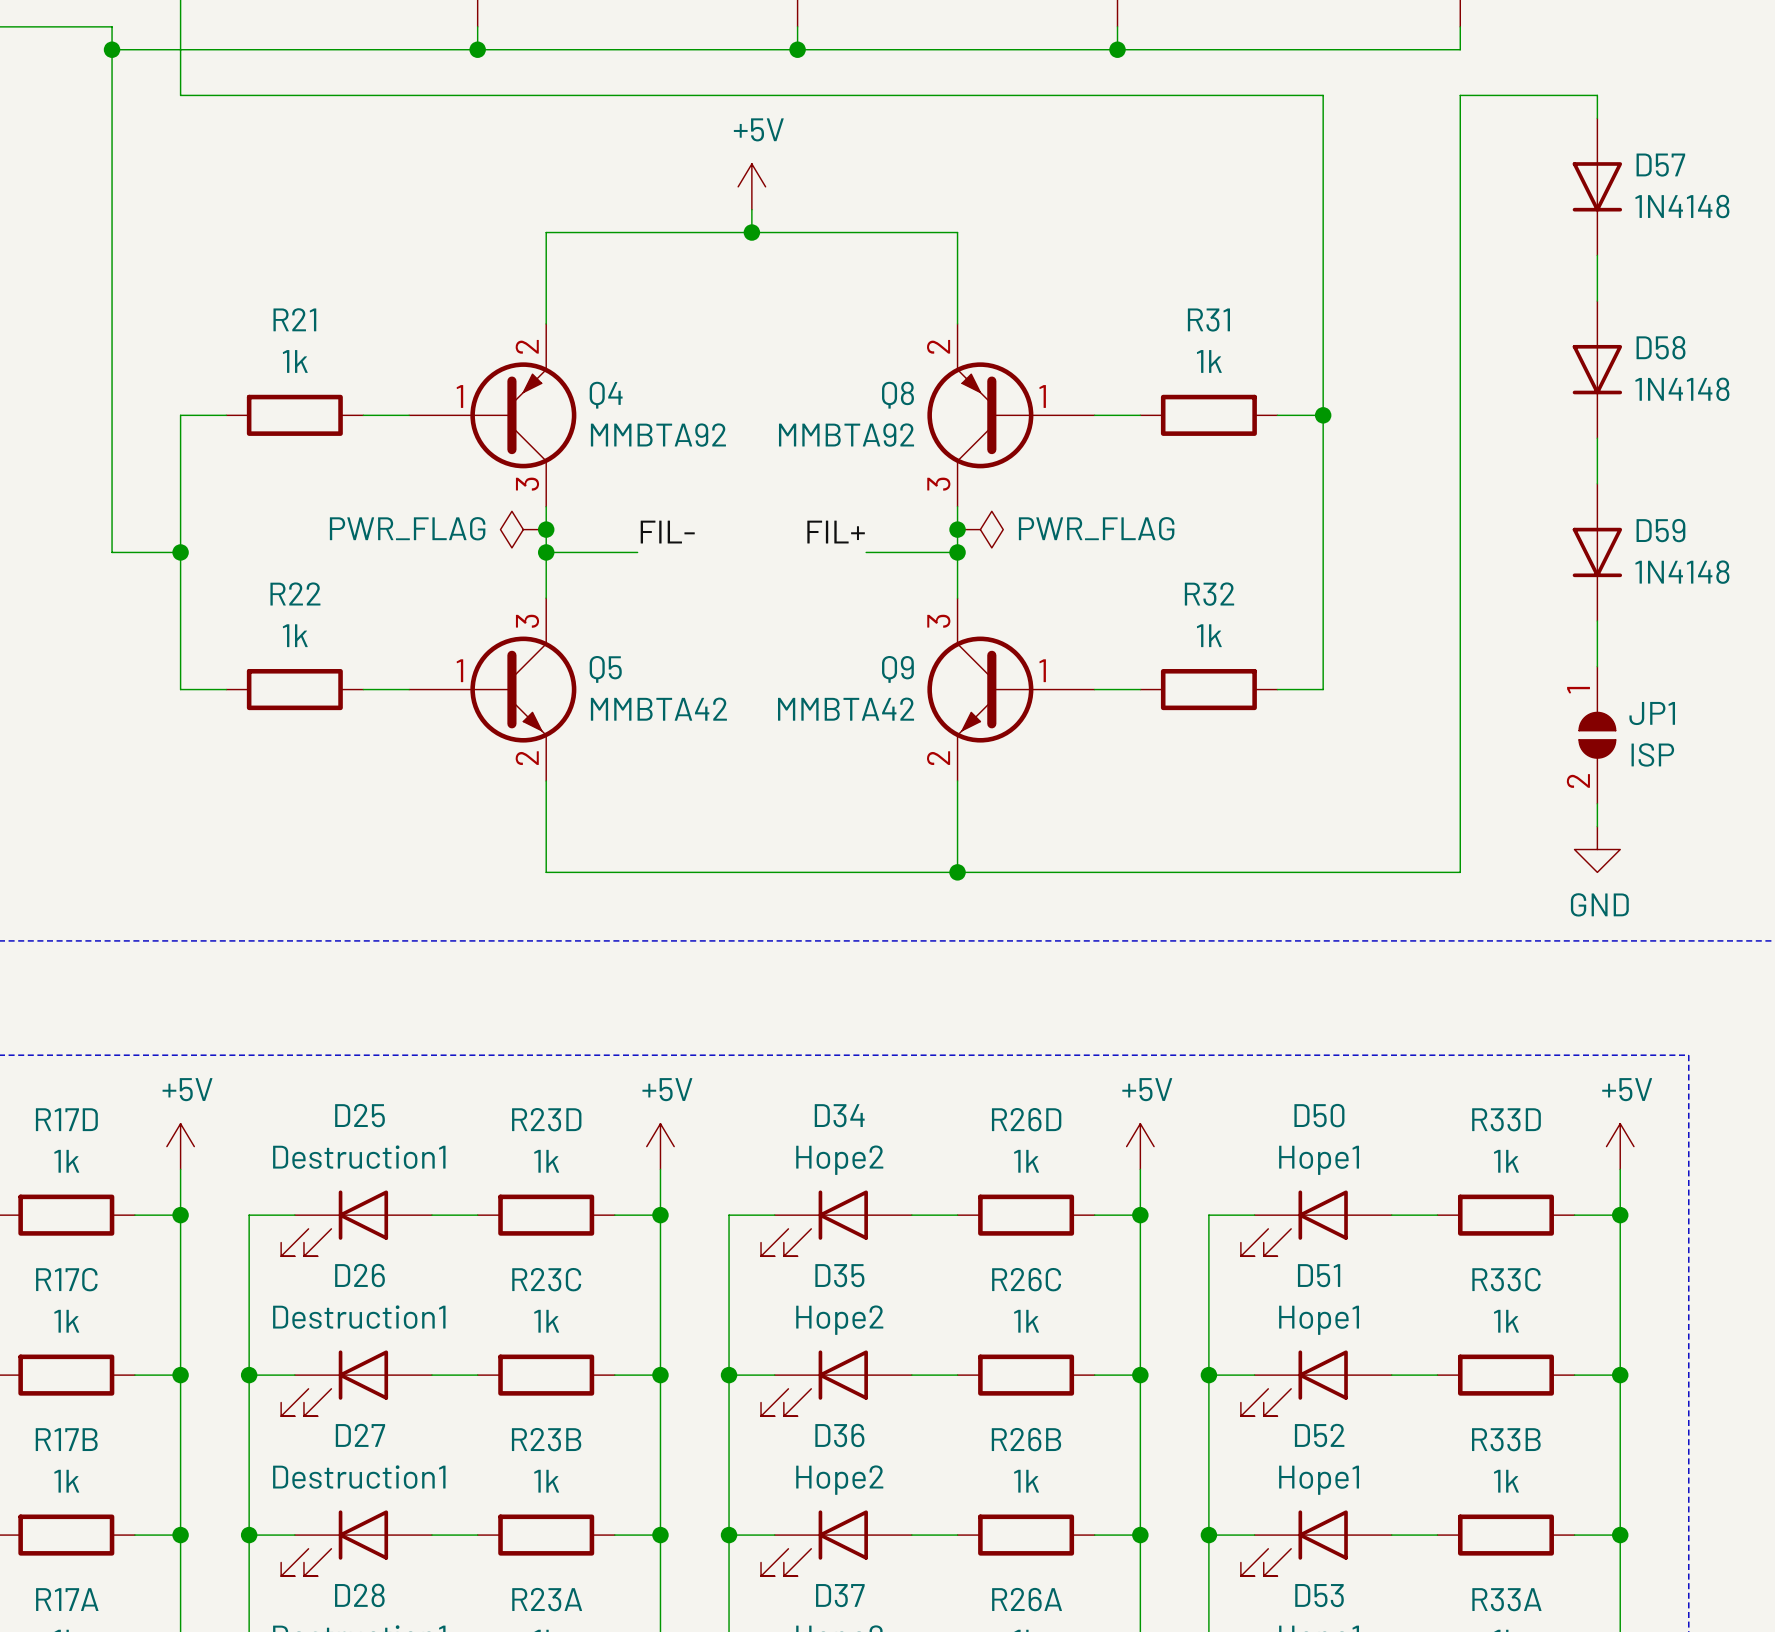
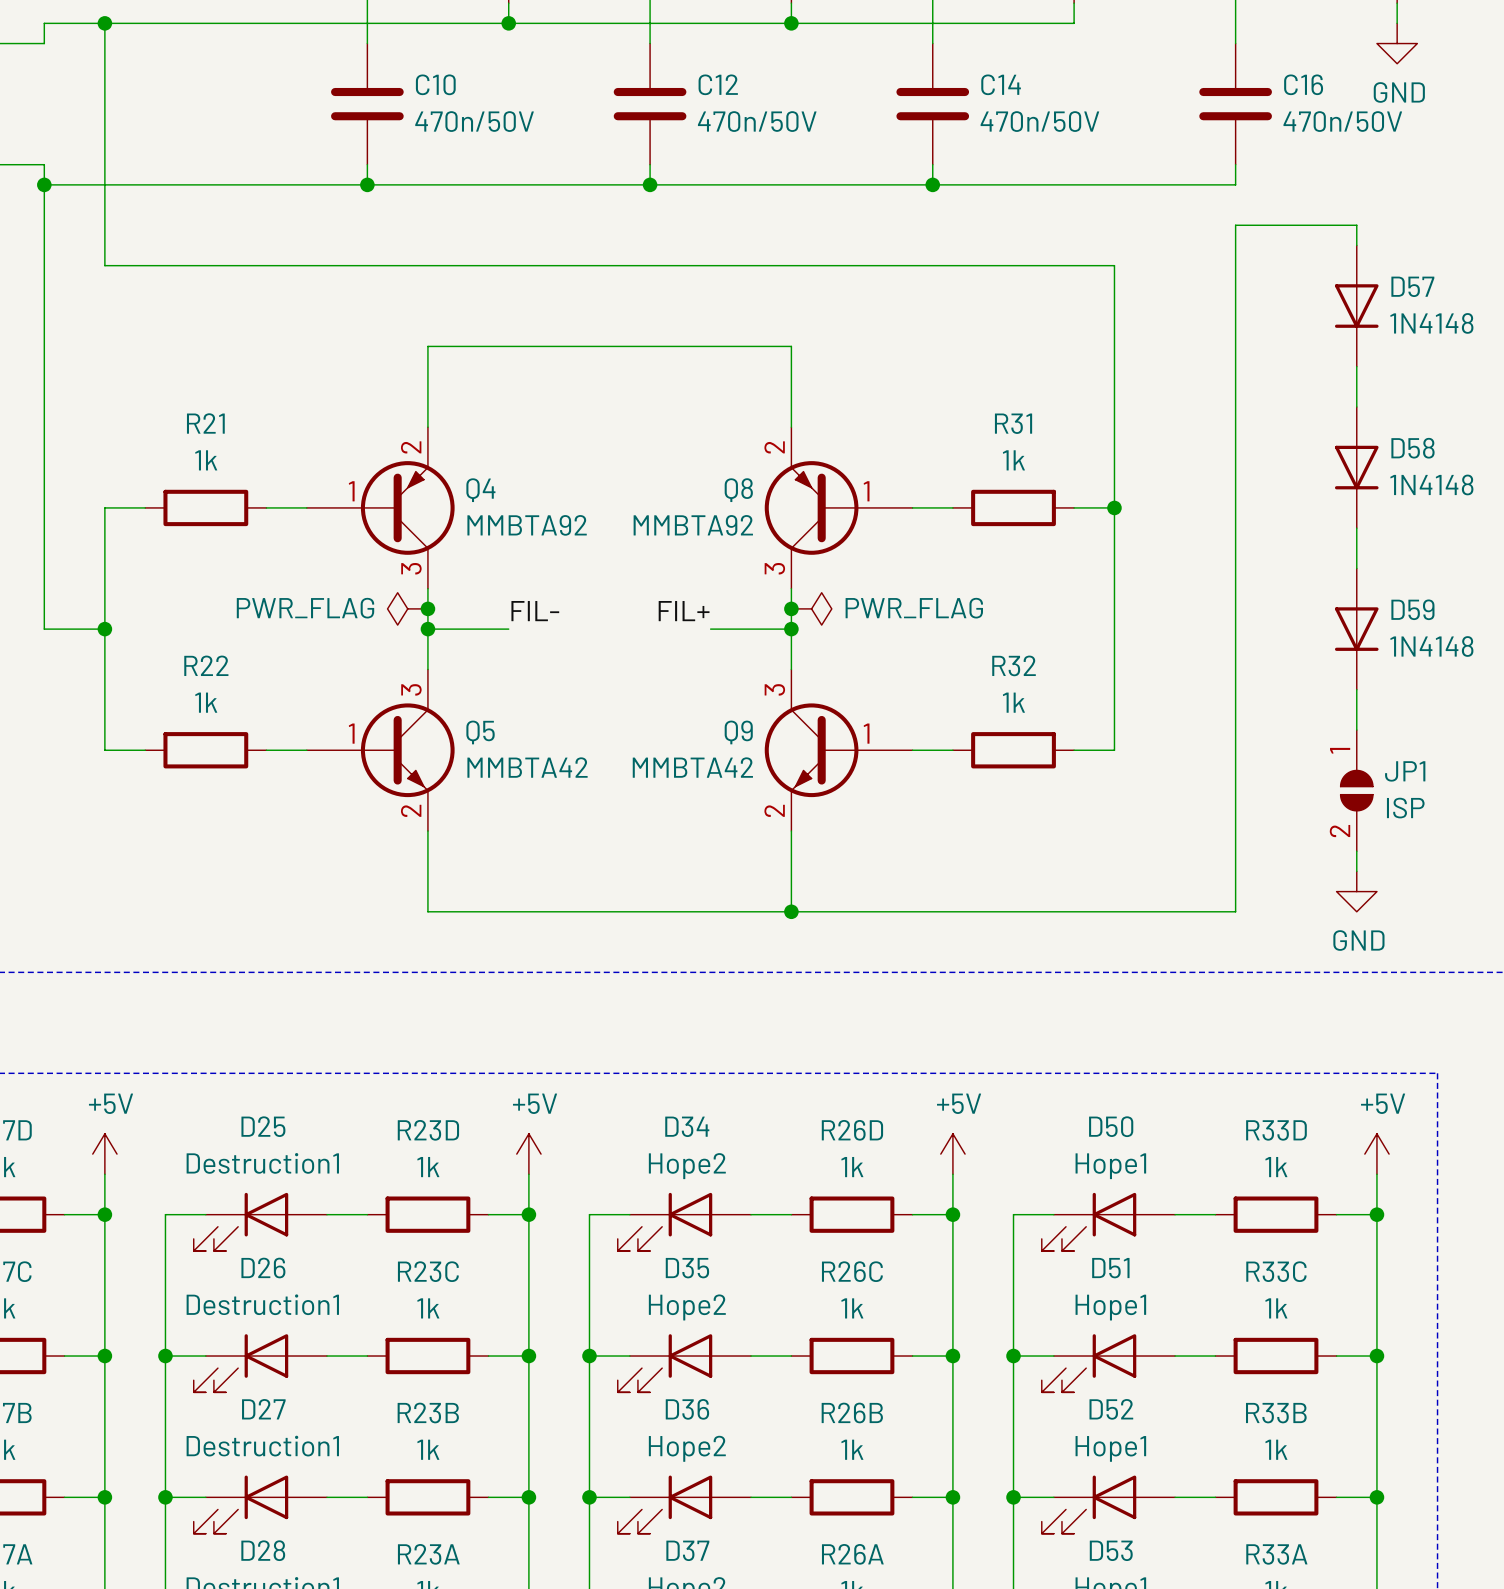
wire: (180, 95) (1323, 95) (1323, 141) -> (104, 225) (104, 265) (1114, 265)
power symbol: +5V (751, 186) -> none
wire: (751, 209) (751, 232) -> none
junction: (751, 232) -> none

